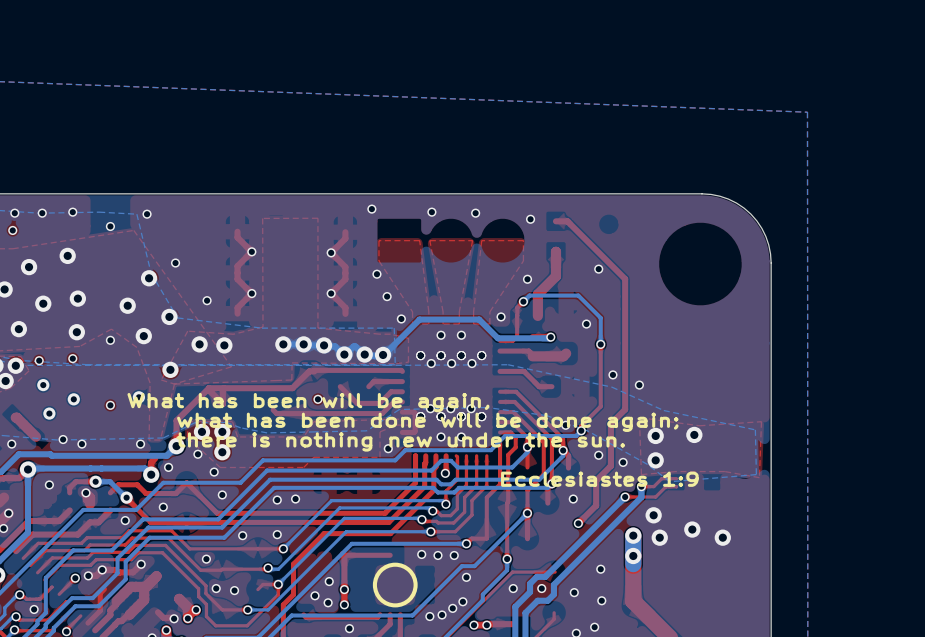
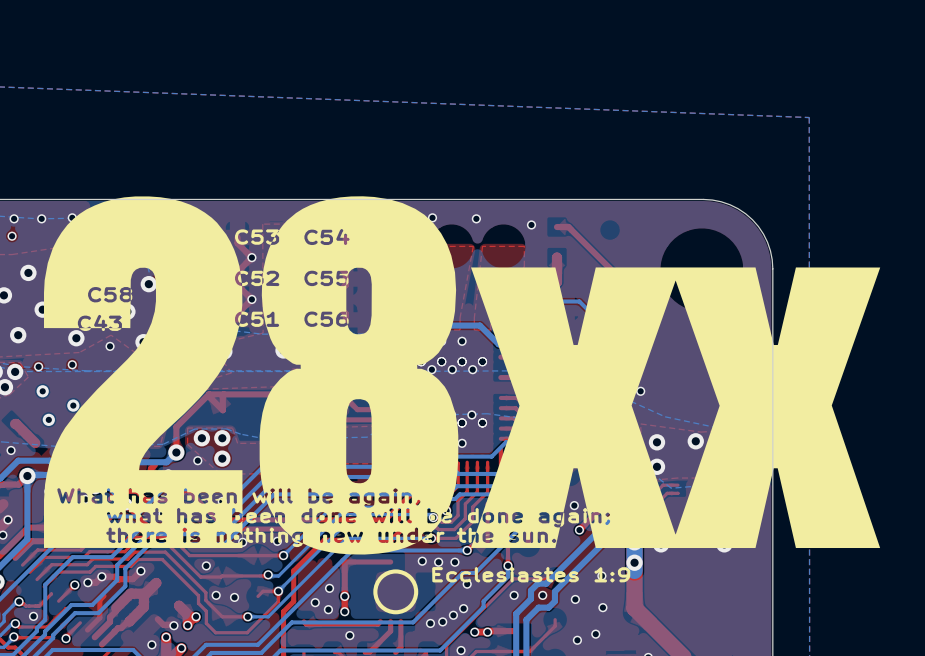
drawing: none -> [43, 196, 881, 583]
text: What has been will be again, (308, 402) -> none
text: what has been done will be done again; (427, 422) -> none
text: there is nothing new under the sun. (400, 441) -> none
text: Ecclesiastes 1:9 (599, 479) -> none

